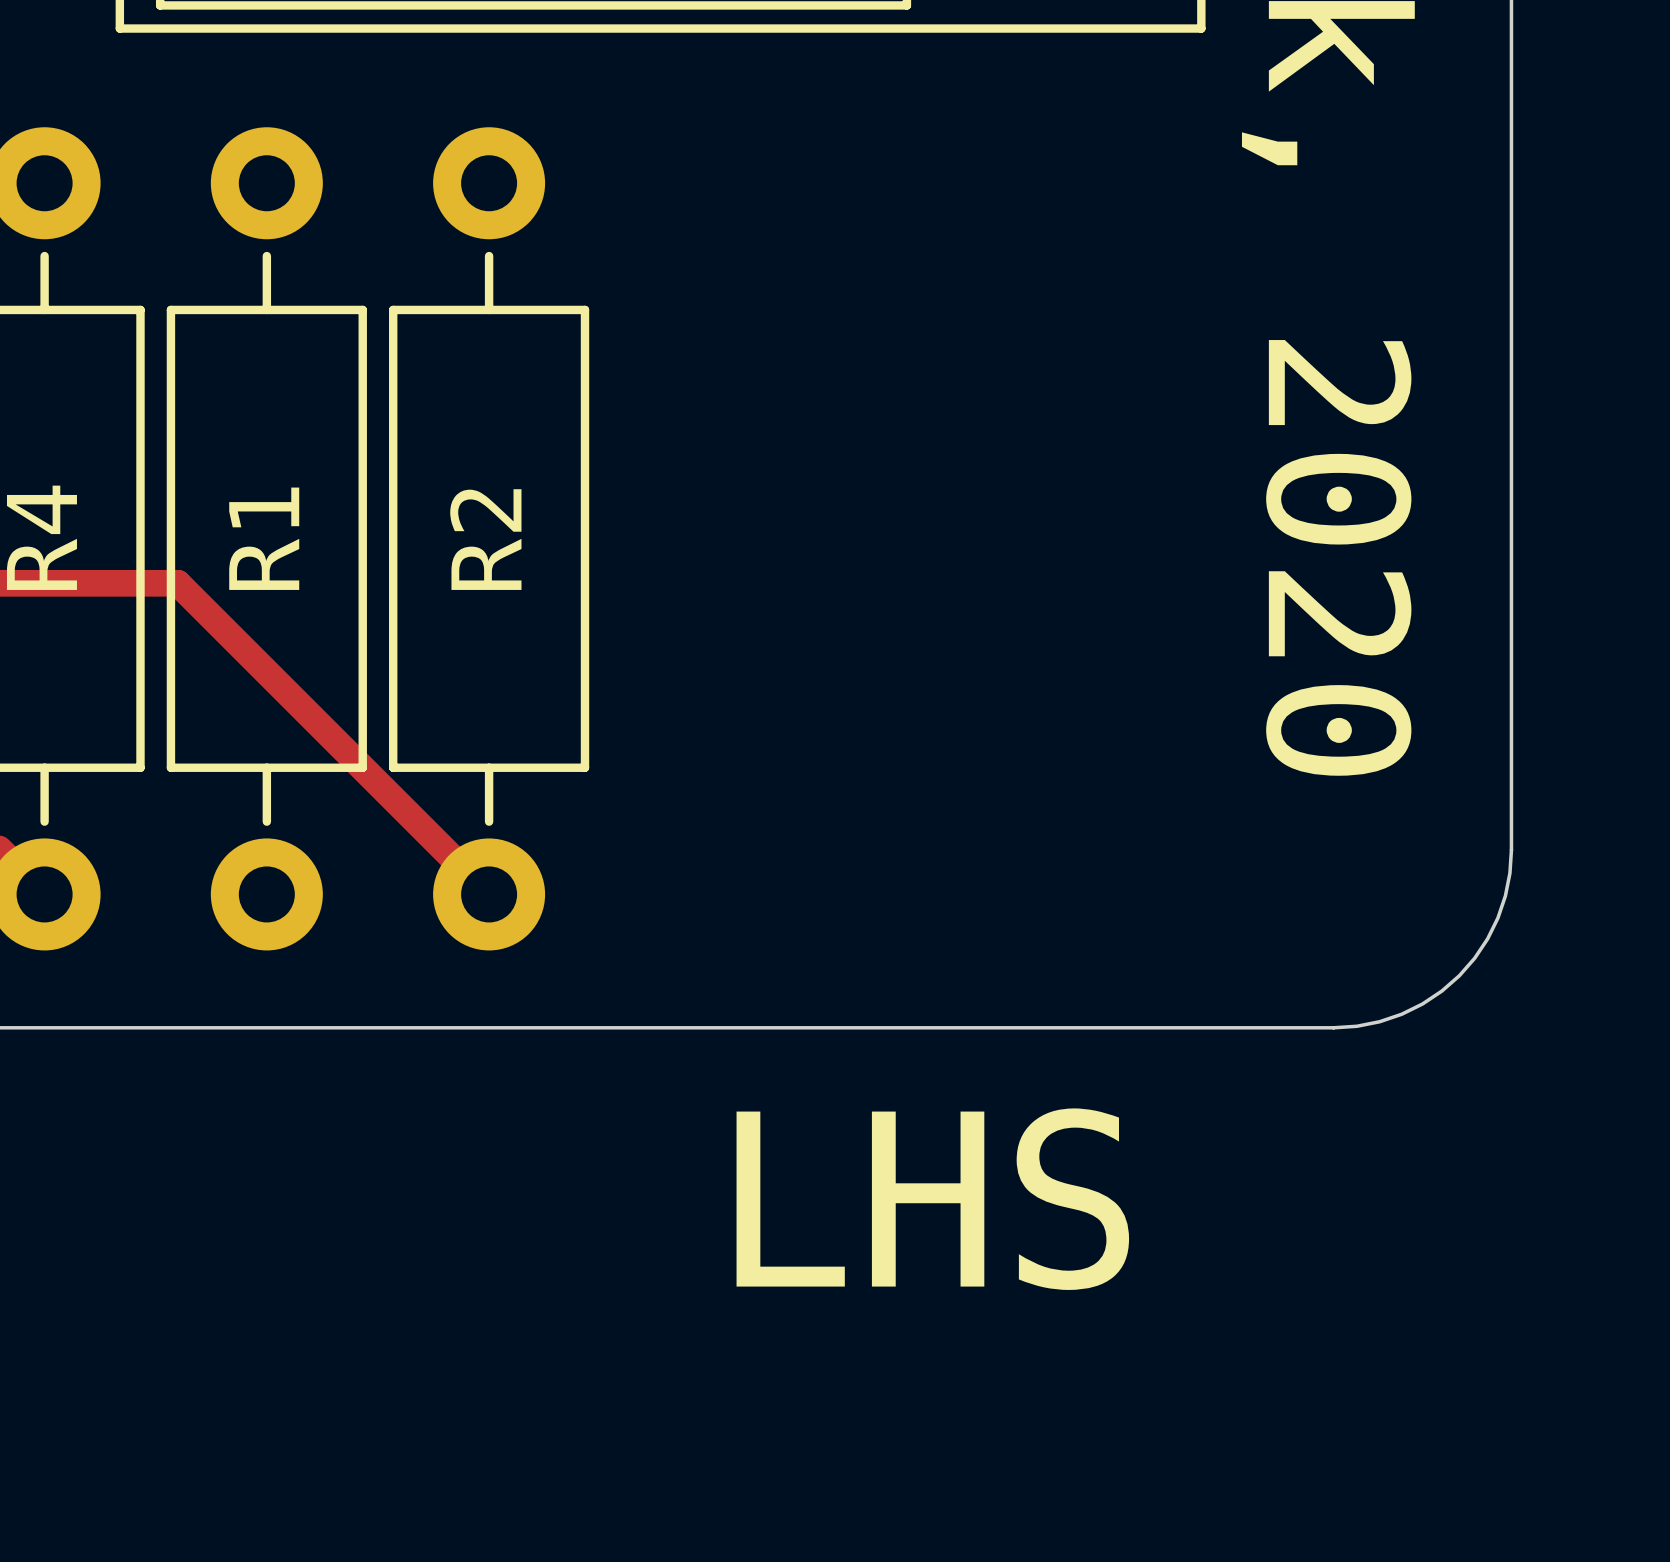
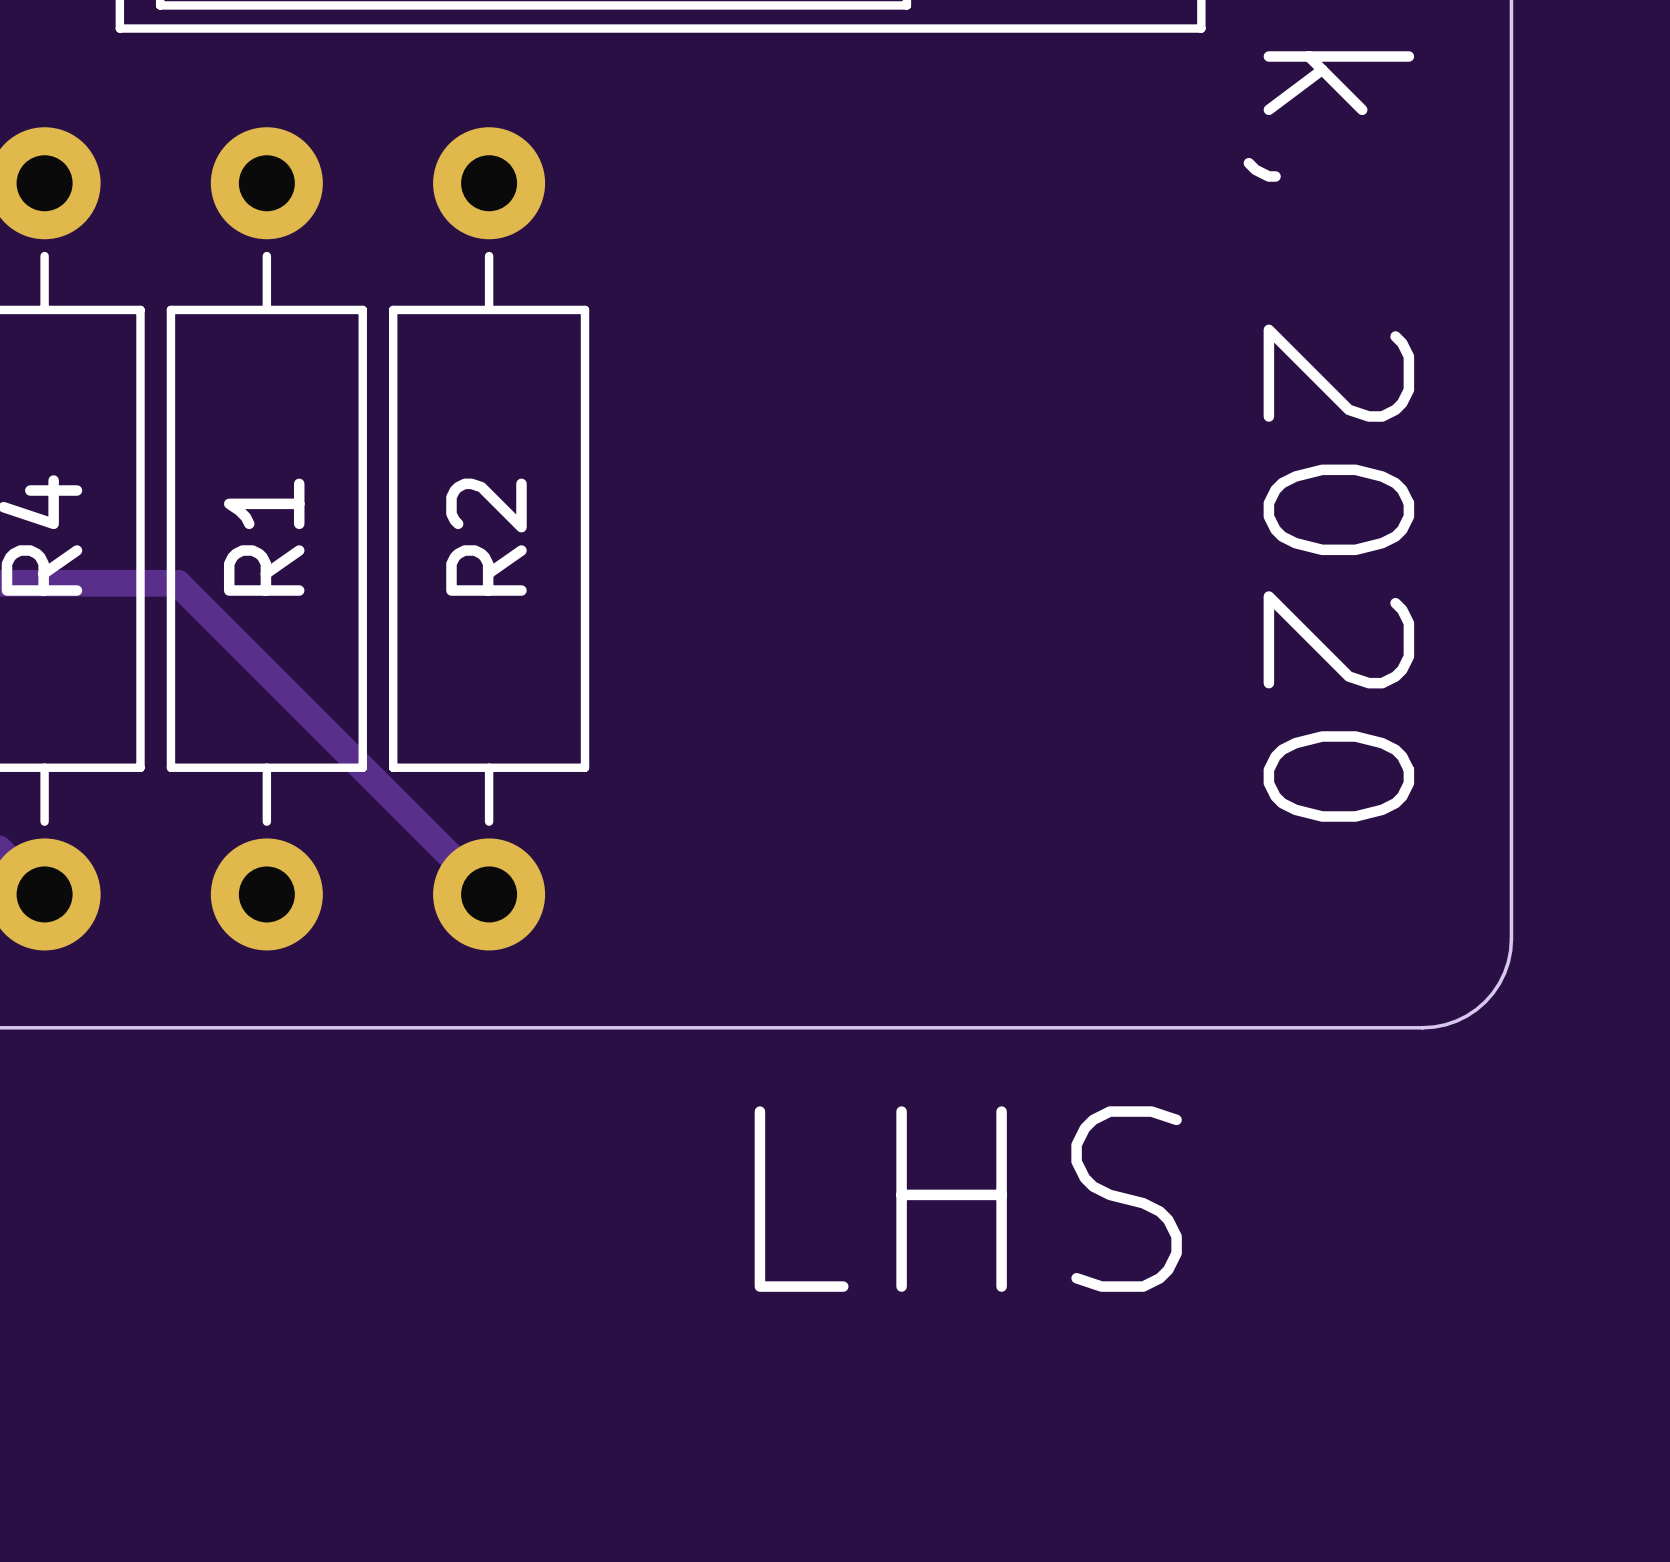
board edge: (1511, 850) (1509, 873) (1505, 896) (1497, 918) (1487, 938) (1474, 958) (1459, 975) (1441, 991) (1422, 1003) (1401, 1014) (1379, 1021) (1356, 1026) (1333, 1027) -> (1511, 850) (1510, 950) (1504, 972) (1499, 983) (1485, 1001) (1467, 1015) (1456, 1021) (1434, 1027) (1333, 1027)

